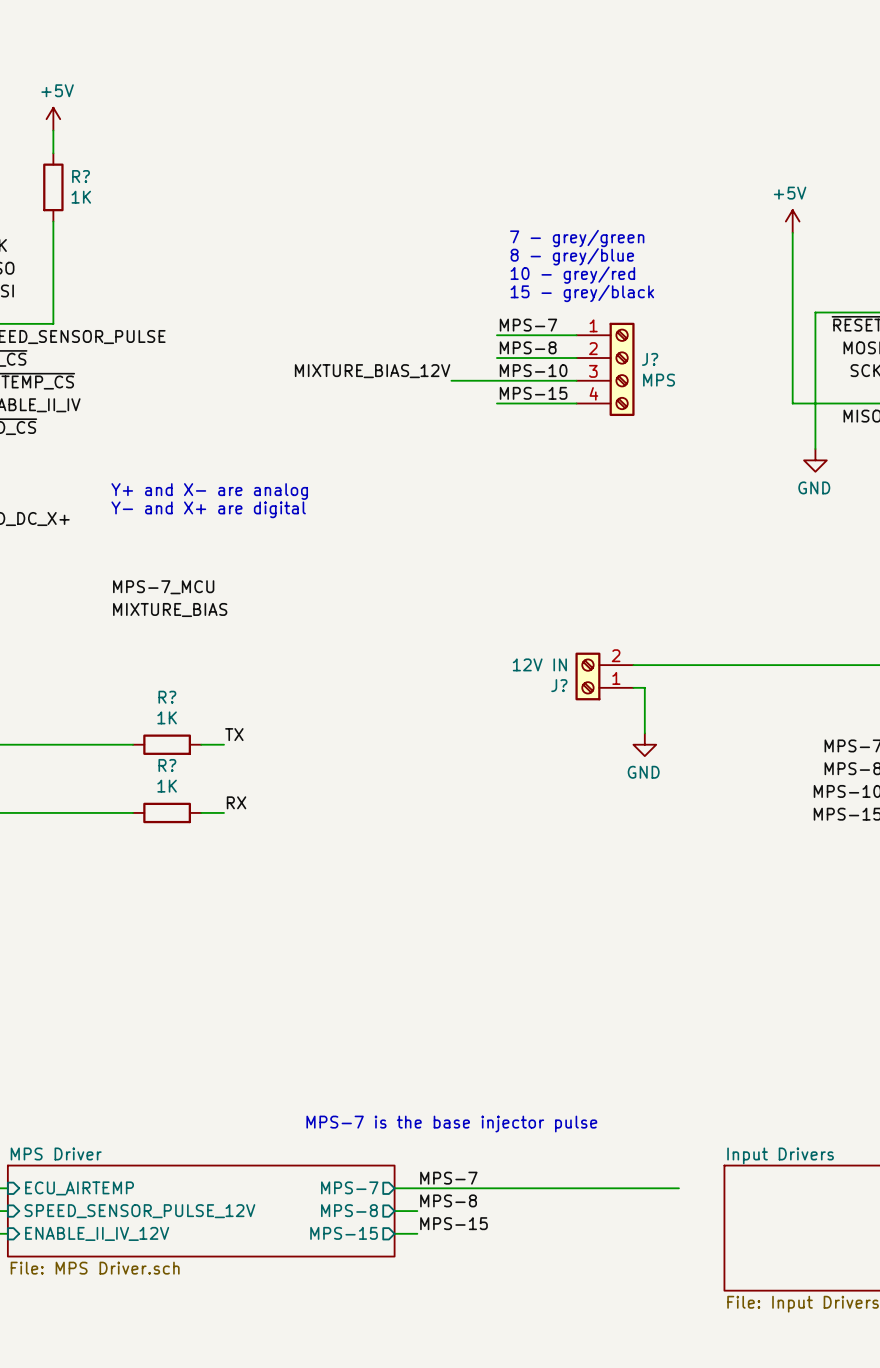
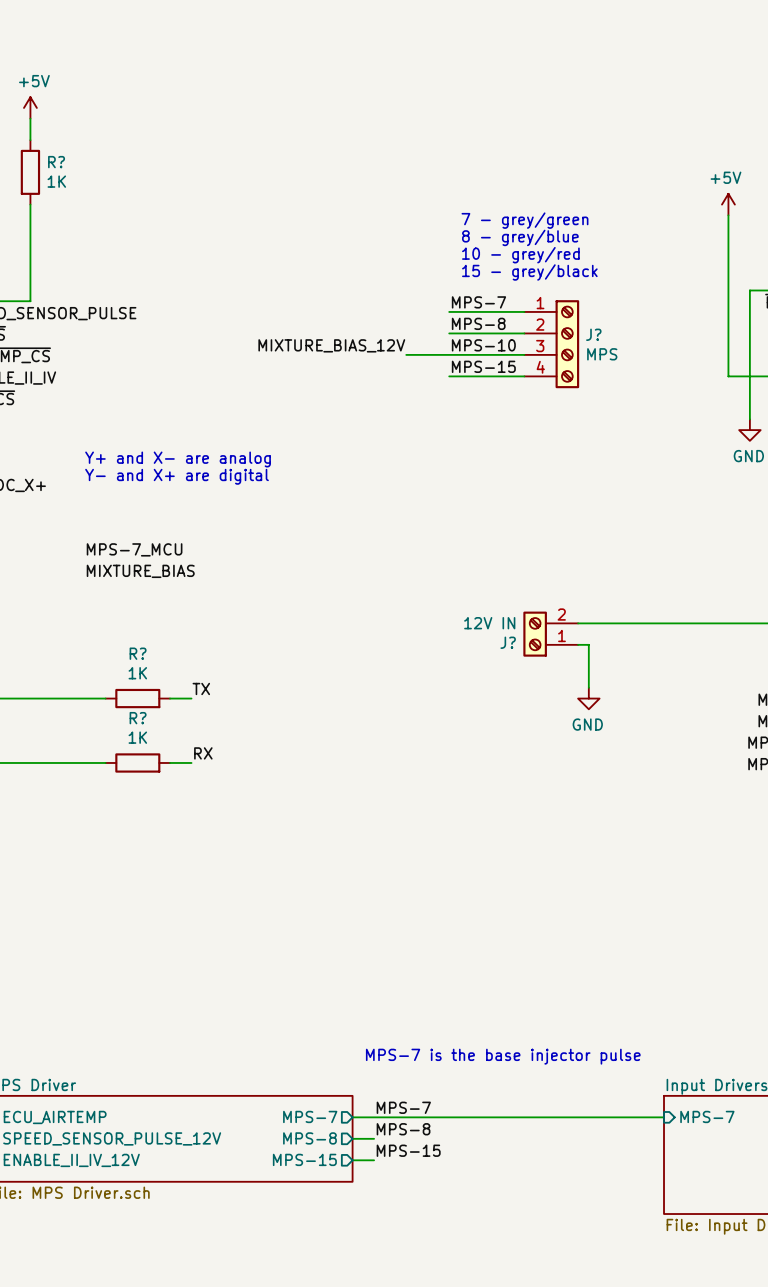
text position: MPS-7 is the base injector pulse (451, 1124) -> MPS-7 is the base injector pulse (503, 1056)
sheet pin: none -> MPS-7 (707, 1116)
wire: none -> (621, 1117) (664, 1117)

